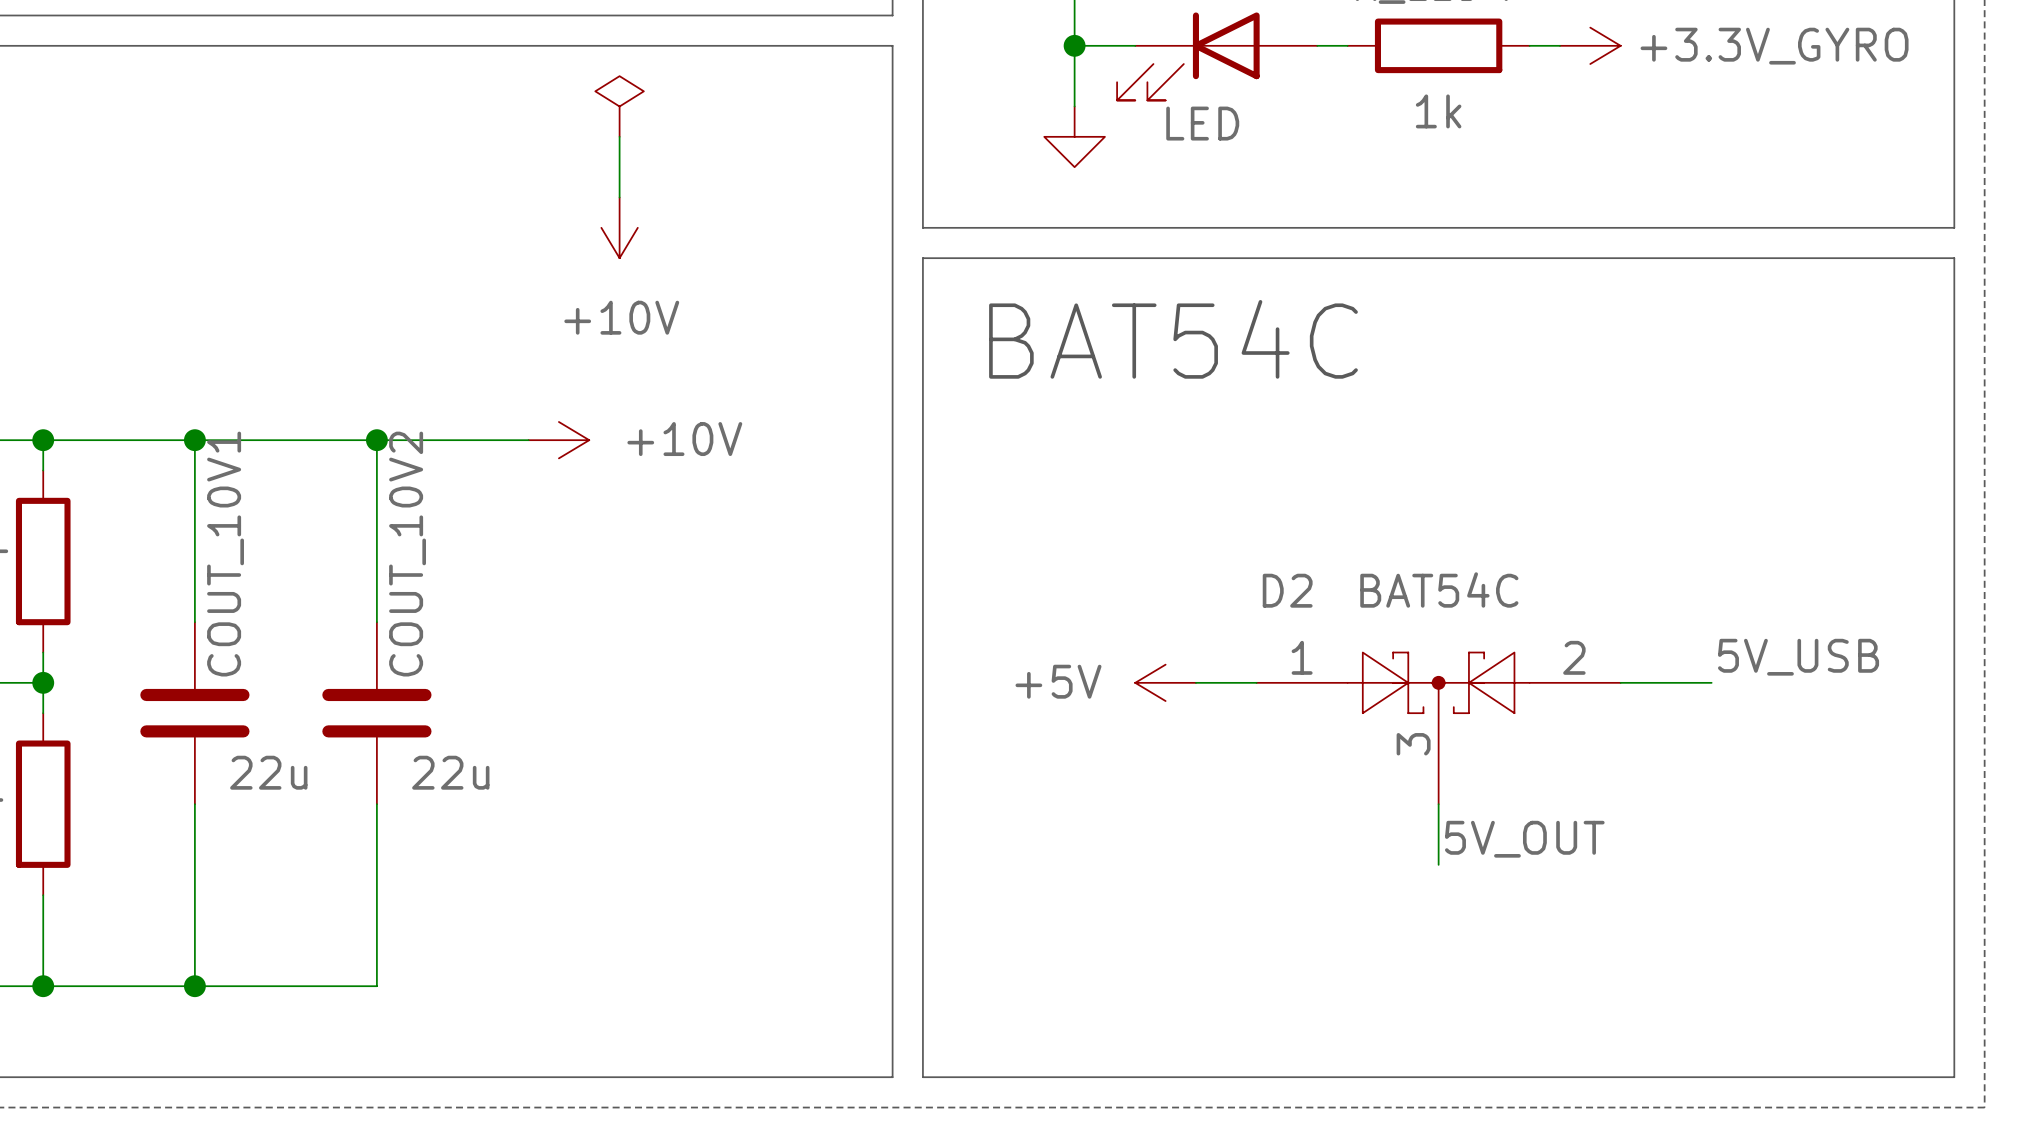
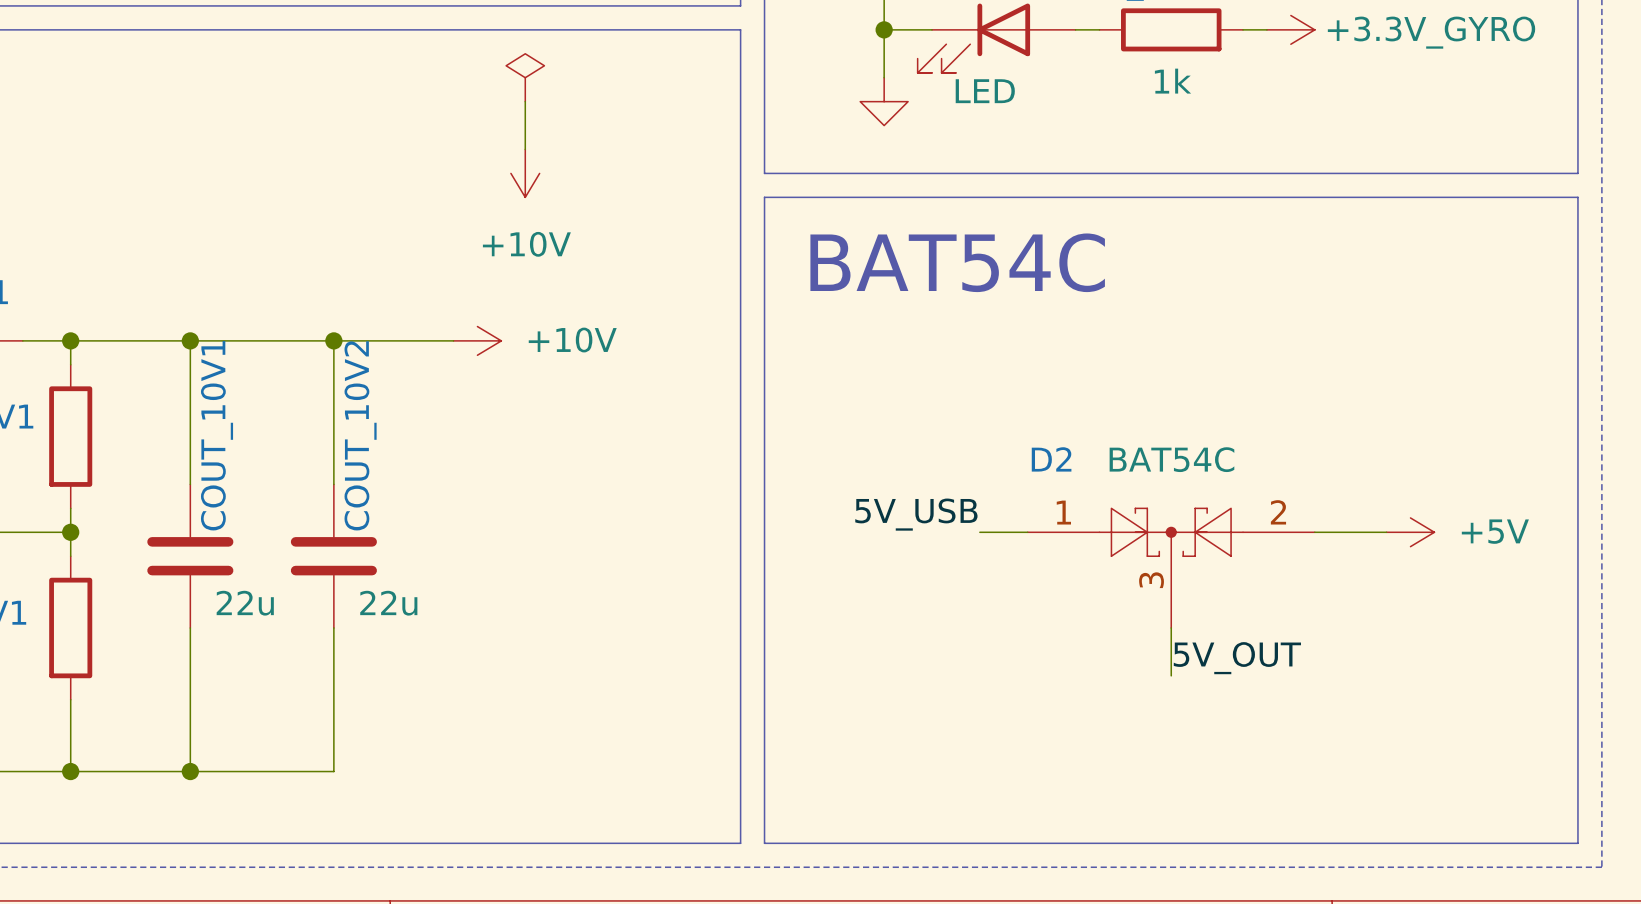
label position: 5V_USB (1798, 657) -> 5V_USB (916, 514)
power symbol rotation: 0° (1165, 682) -> 180° (1410, 532)
power symbol position: +5V (1165, 682) -> +5V (1410, 532)

